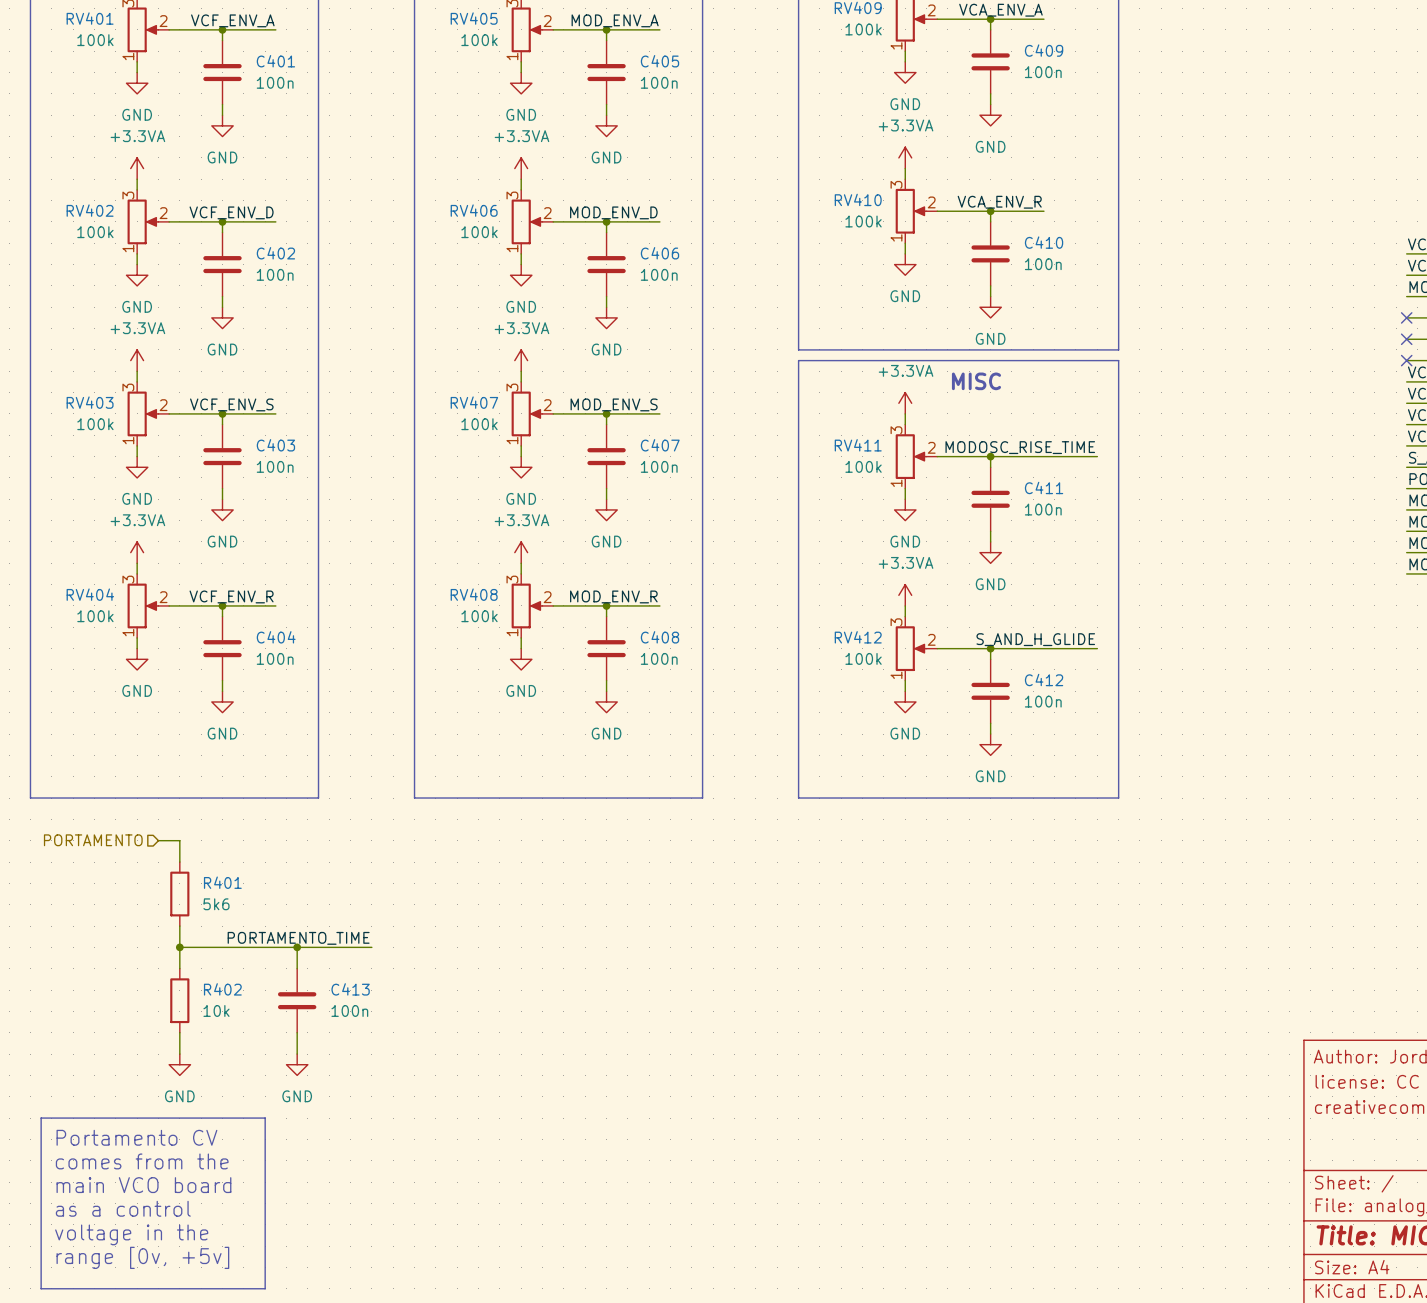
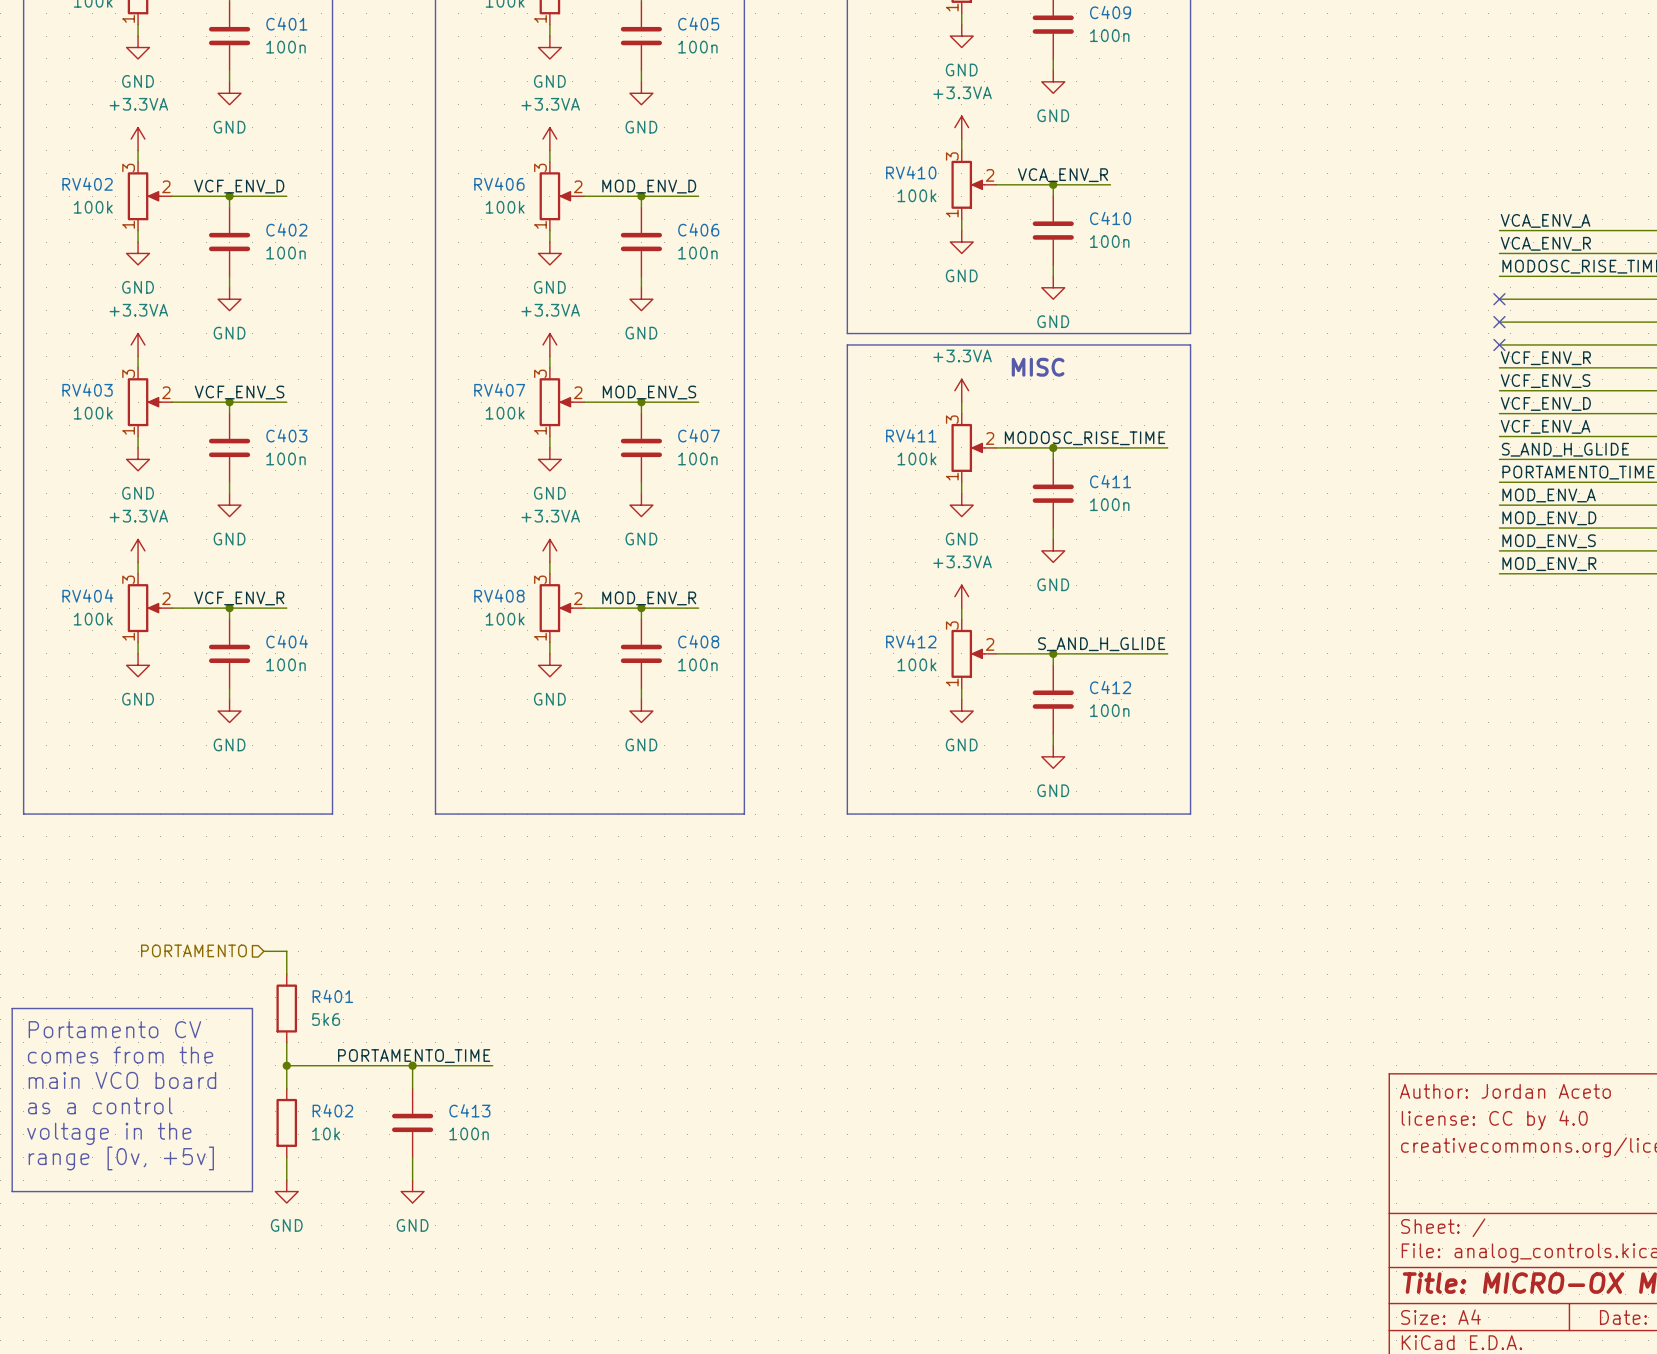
hierarchical label position: PORTAMENTO (93, 840) -> PORTAMENTO (193, 950)
wire: (158, 840) (179, 840) (179, 862) -> (263, 951) (286, 951) (286, 974)
R401 position: (179, 894) -> (286, 1008)
wire: (179, 926) (179, 968) -> (286, 1042) (286, 1088)
label position: PORTAMENTO_TIME (298, 938) -> PORTAMENTO_TIME (414, 1056)
wire: (179, 947) (371, 947) -> (286, 1065) (492, 1065)
junction: (179, 947) -> none
wire: (297, 947) (297, 968) -> (412, 1065) (412, 1088)
junction: (297, 947) -> none
R402 position: (179, 1000) -> (286, 1122)
C413 position: (297, 1000) -> (412, 1122)
wire: (179, 1032) (179, 1054) -> (286, 1157) (286, 1180)
junction: none -> (286, 1065)
wire: (297, 1032) (297, 1054) -> (412, 1157) (412, 1180)
junction: none -> (412, 1065)
power symbol: GND (179, 1064) -> none
power symbol: GND (297, 1064) -> none
line: (41, 1118) (265, 1118) (265, 1288) (41, 1288) (41, 1118) -> (12, 1008) (252, 1008) (252, 1191) (12, 1191) (12, 1008)
text position: Portamento CV (136, 1137) -> Portamento CV (114, 1029)
power symbol: none -> GND (286, 1191)
power symbol: none -> GND (412, 1191)
text position: comes from the (142, 1161) -> comes from the (120, 1055)
text position: main VCO board (143, 1185) -> main VCO board (122, 1080)
text position: as a control (123, 1208) -> as a control (100, 1105)
text position: voltage in the (131, 1234) -> voltage in the (109, 1133)
text position: range [0v, +5v] (142, 1257) -> range [0v, +5v] (121, 1158)

